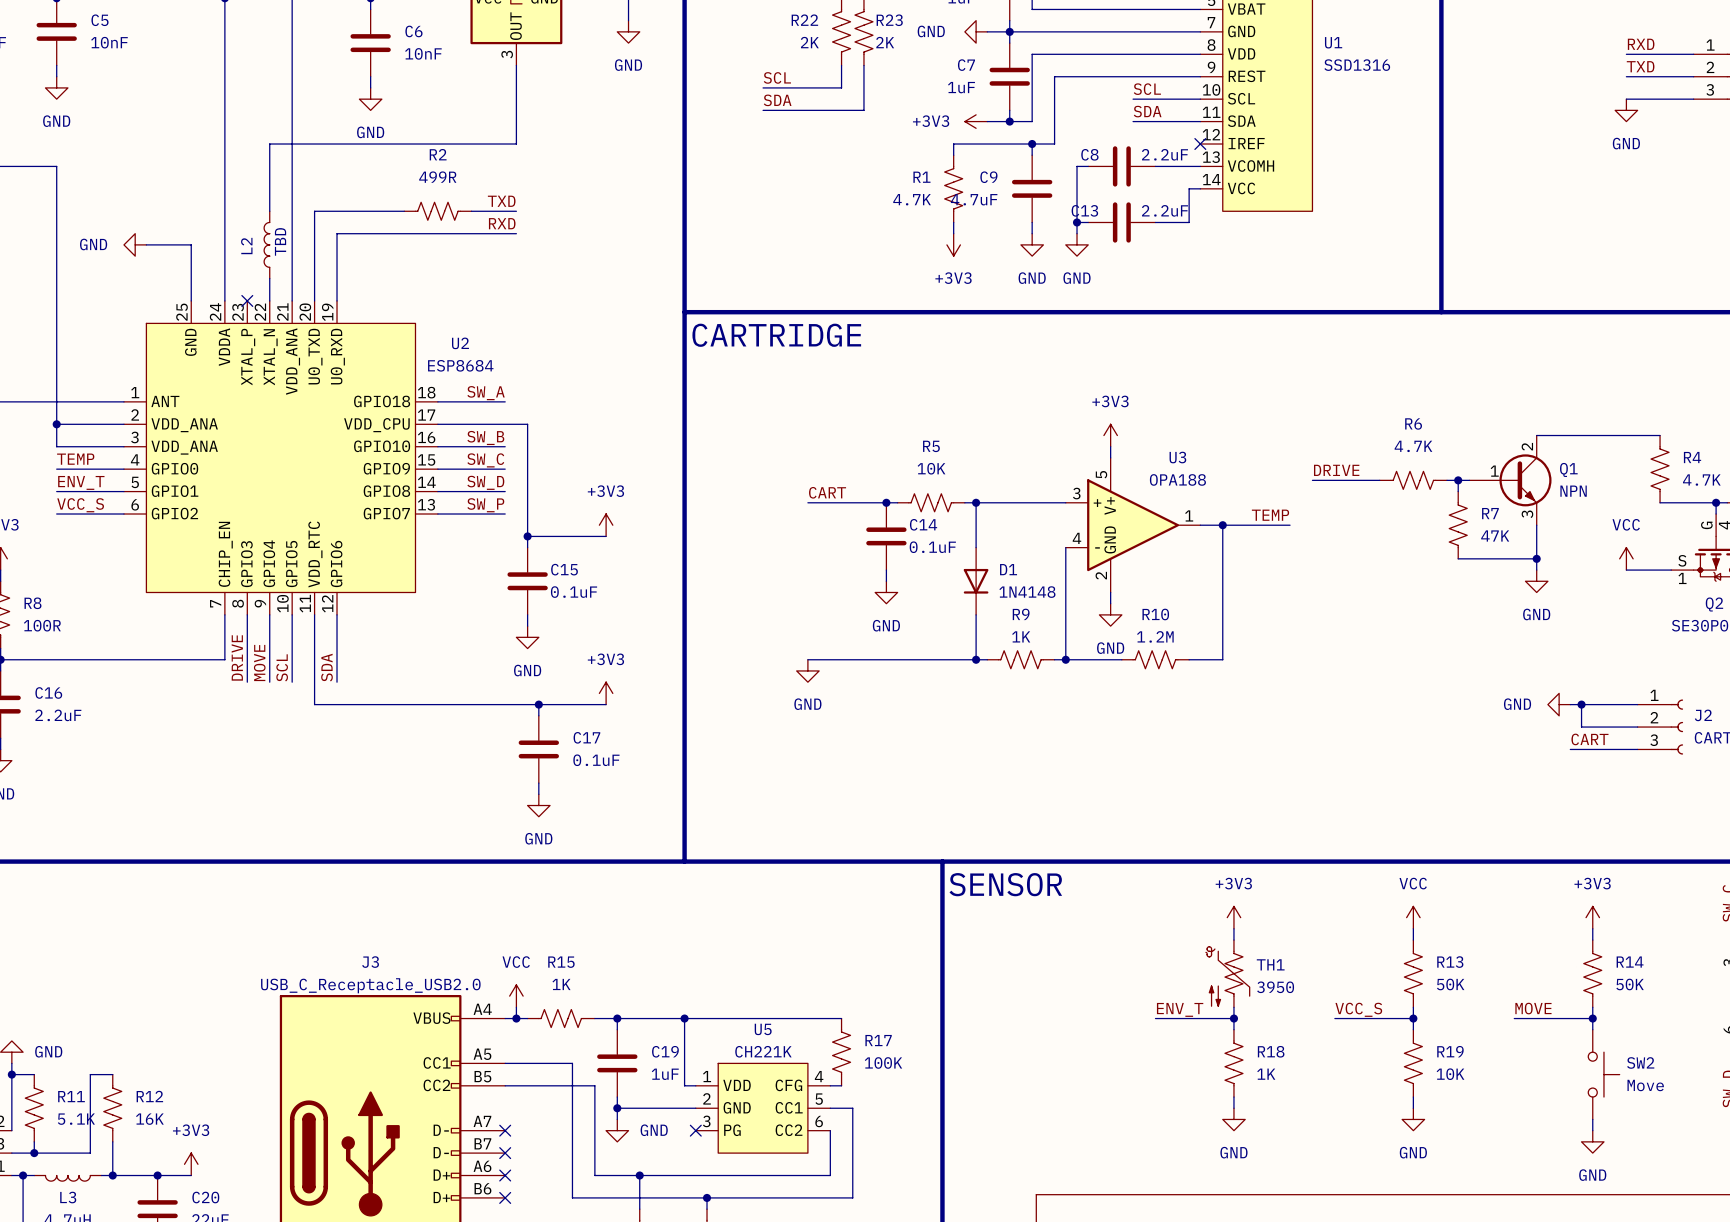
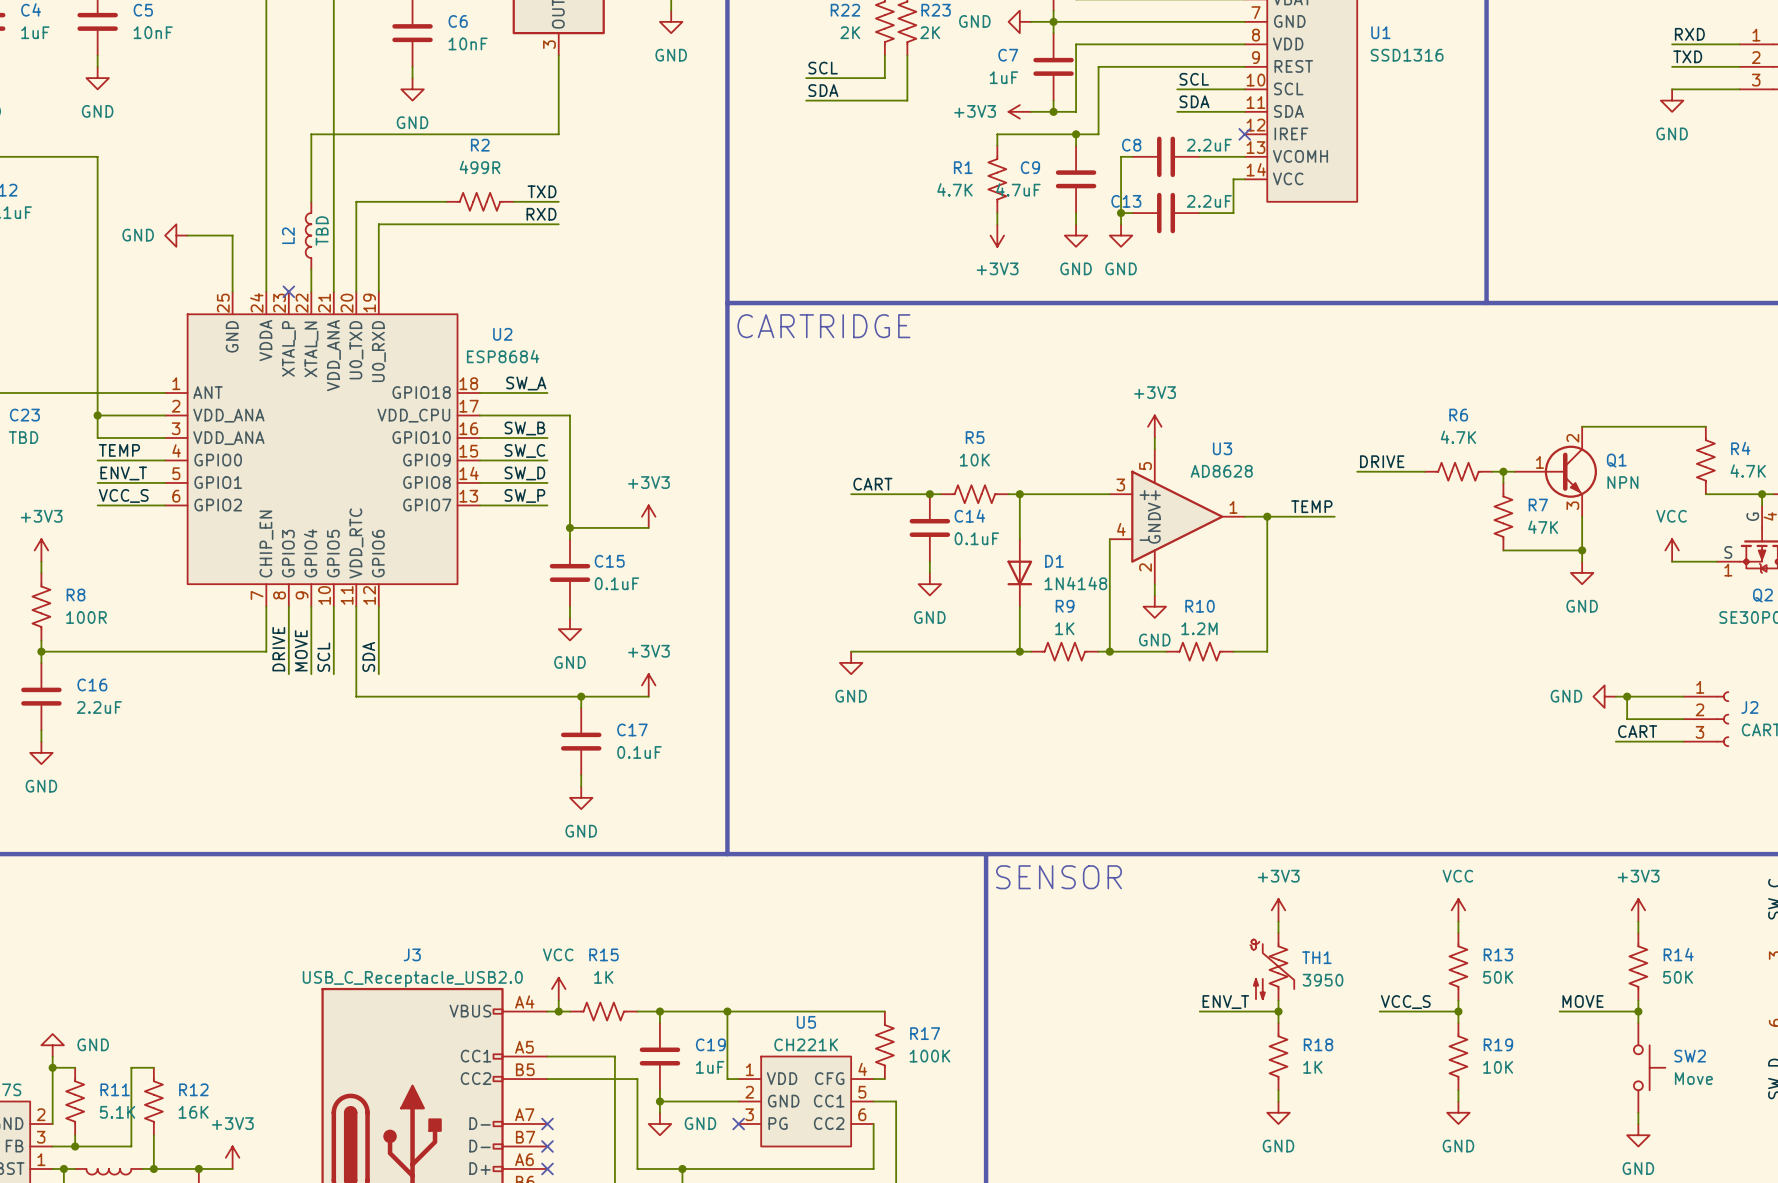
U3 value: OPA188 (1177, 479) -> AD8628 (1221, 471)

